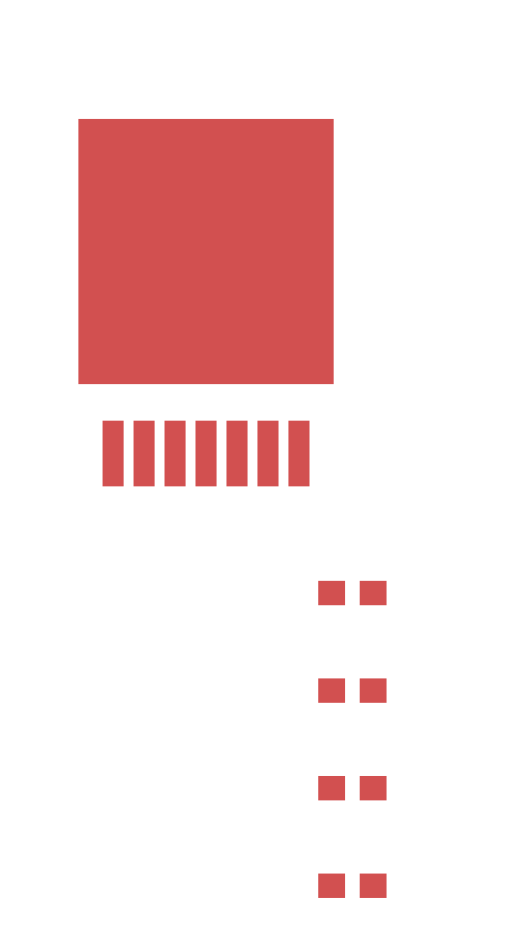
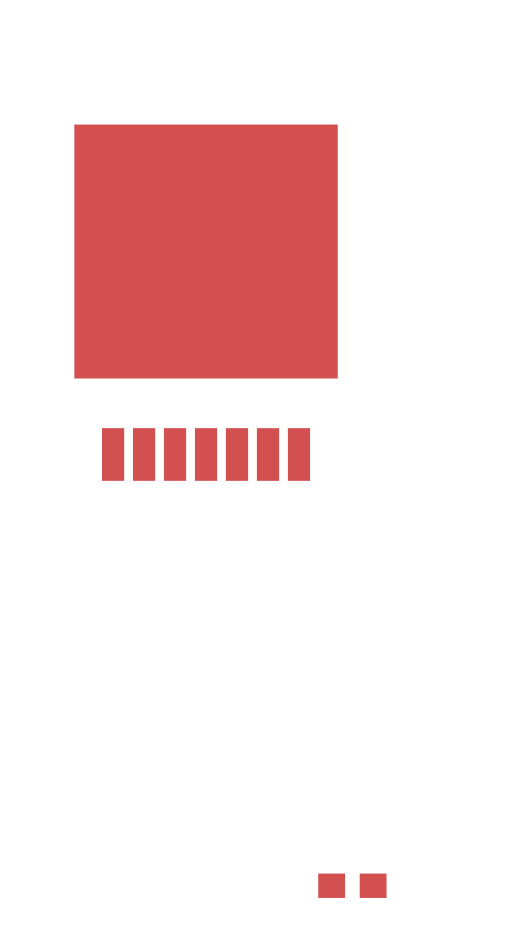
part footprint: [78, 118, 334, 487] -> [74, 124, 338, 481]
part: (352, 593) -> none
part: (352, 690) -> none
part: (352, 788) -> none

